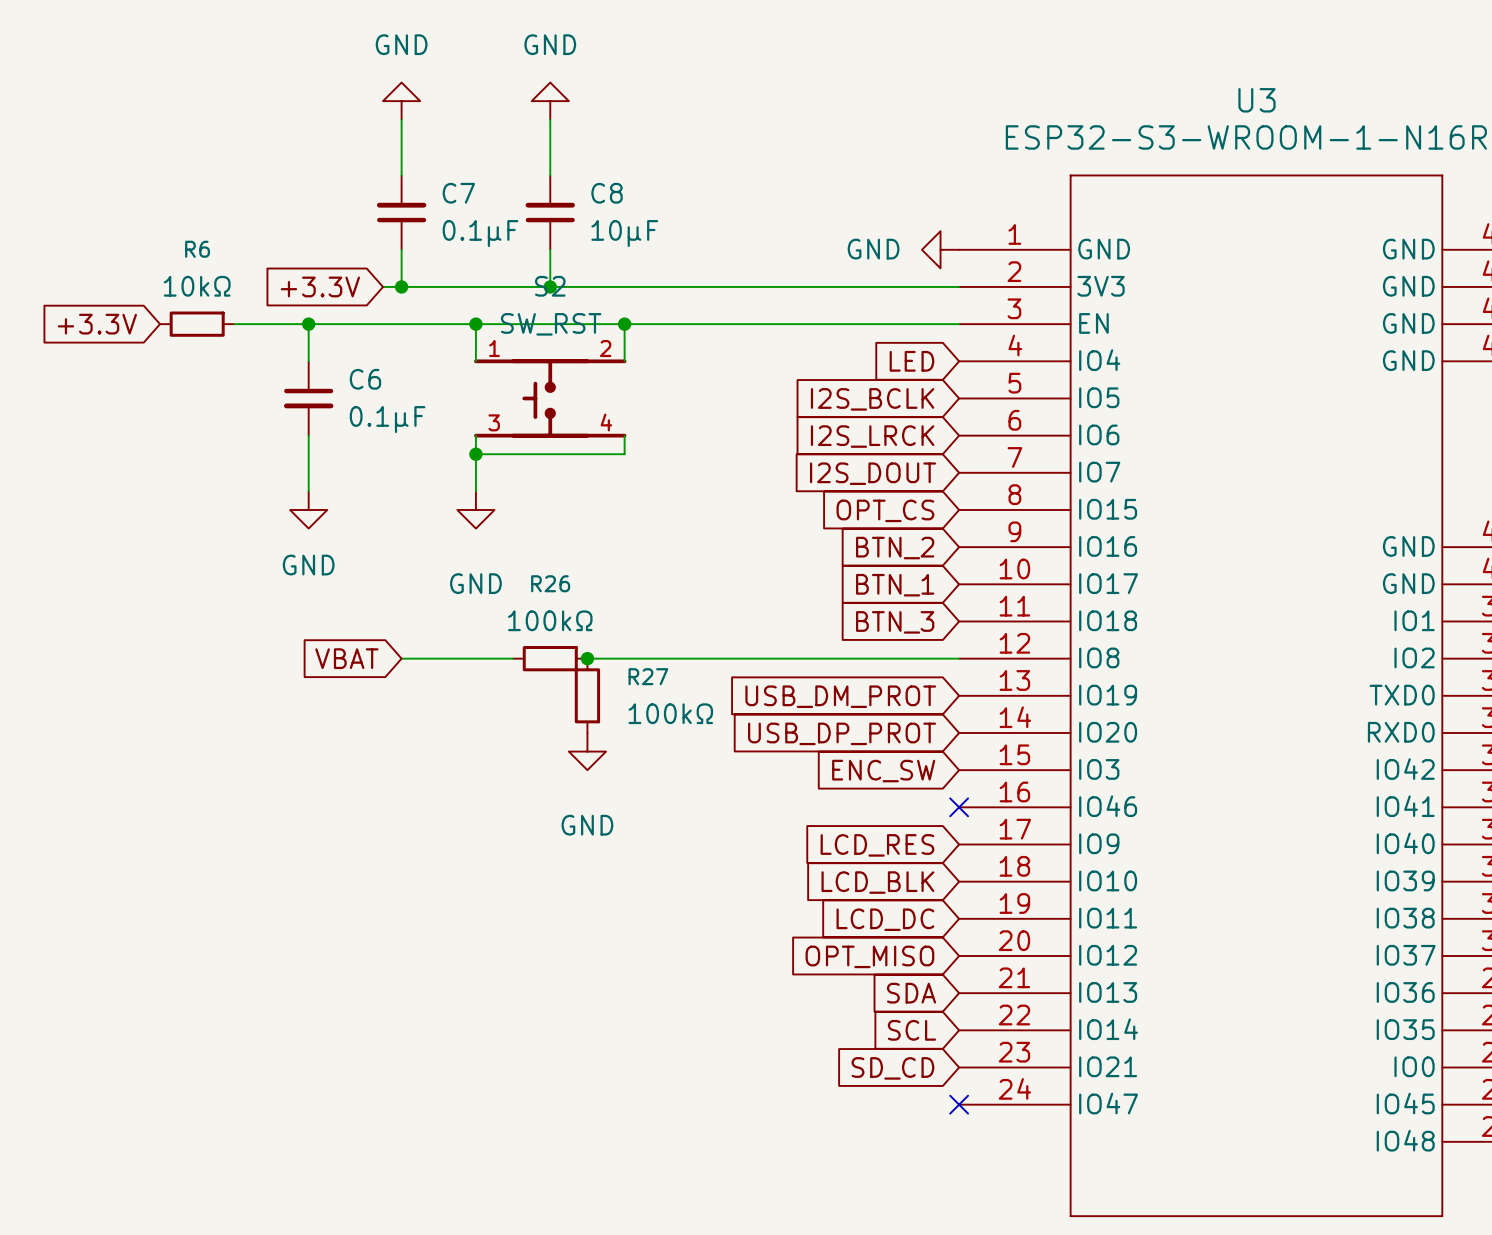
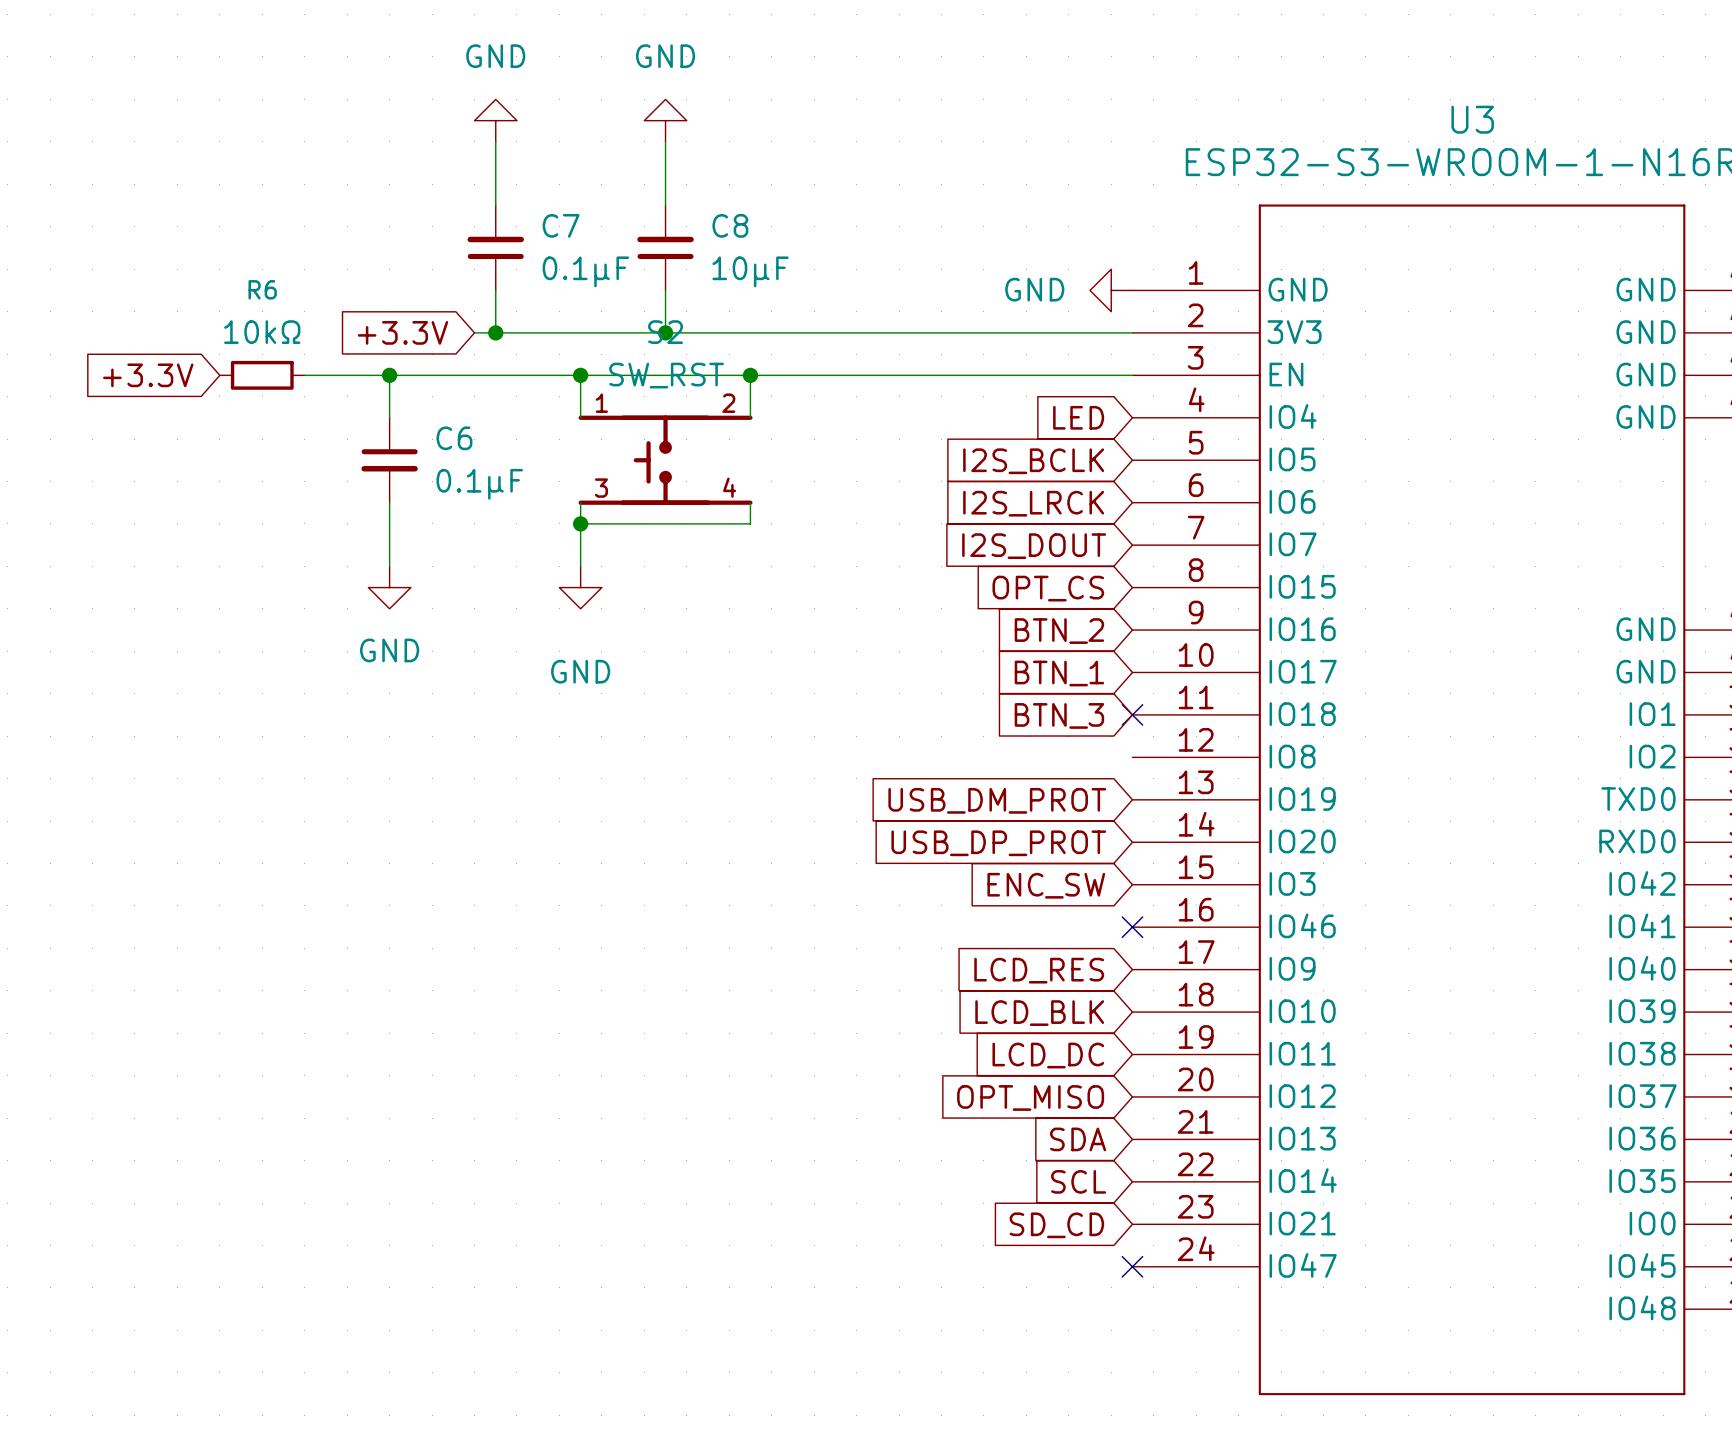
no-connect mark: none -> (1132, 714)
global label: VBAT (346, 658) -> none
wire: (401, 658) (513, 658) -> none
R26: 100kΩ (550, 658) -> none
wire: (587, 658) (959, 658) -> none
junction: (587, 658) -> none
R27: 100kΩ (587, 695) -> none
power symbol: GND (587, 751) -> none

